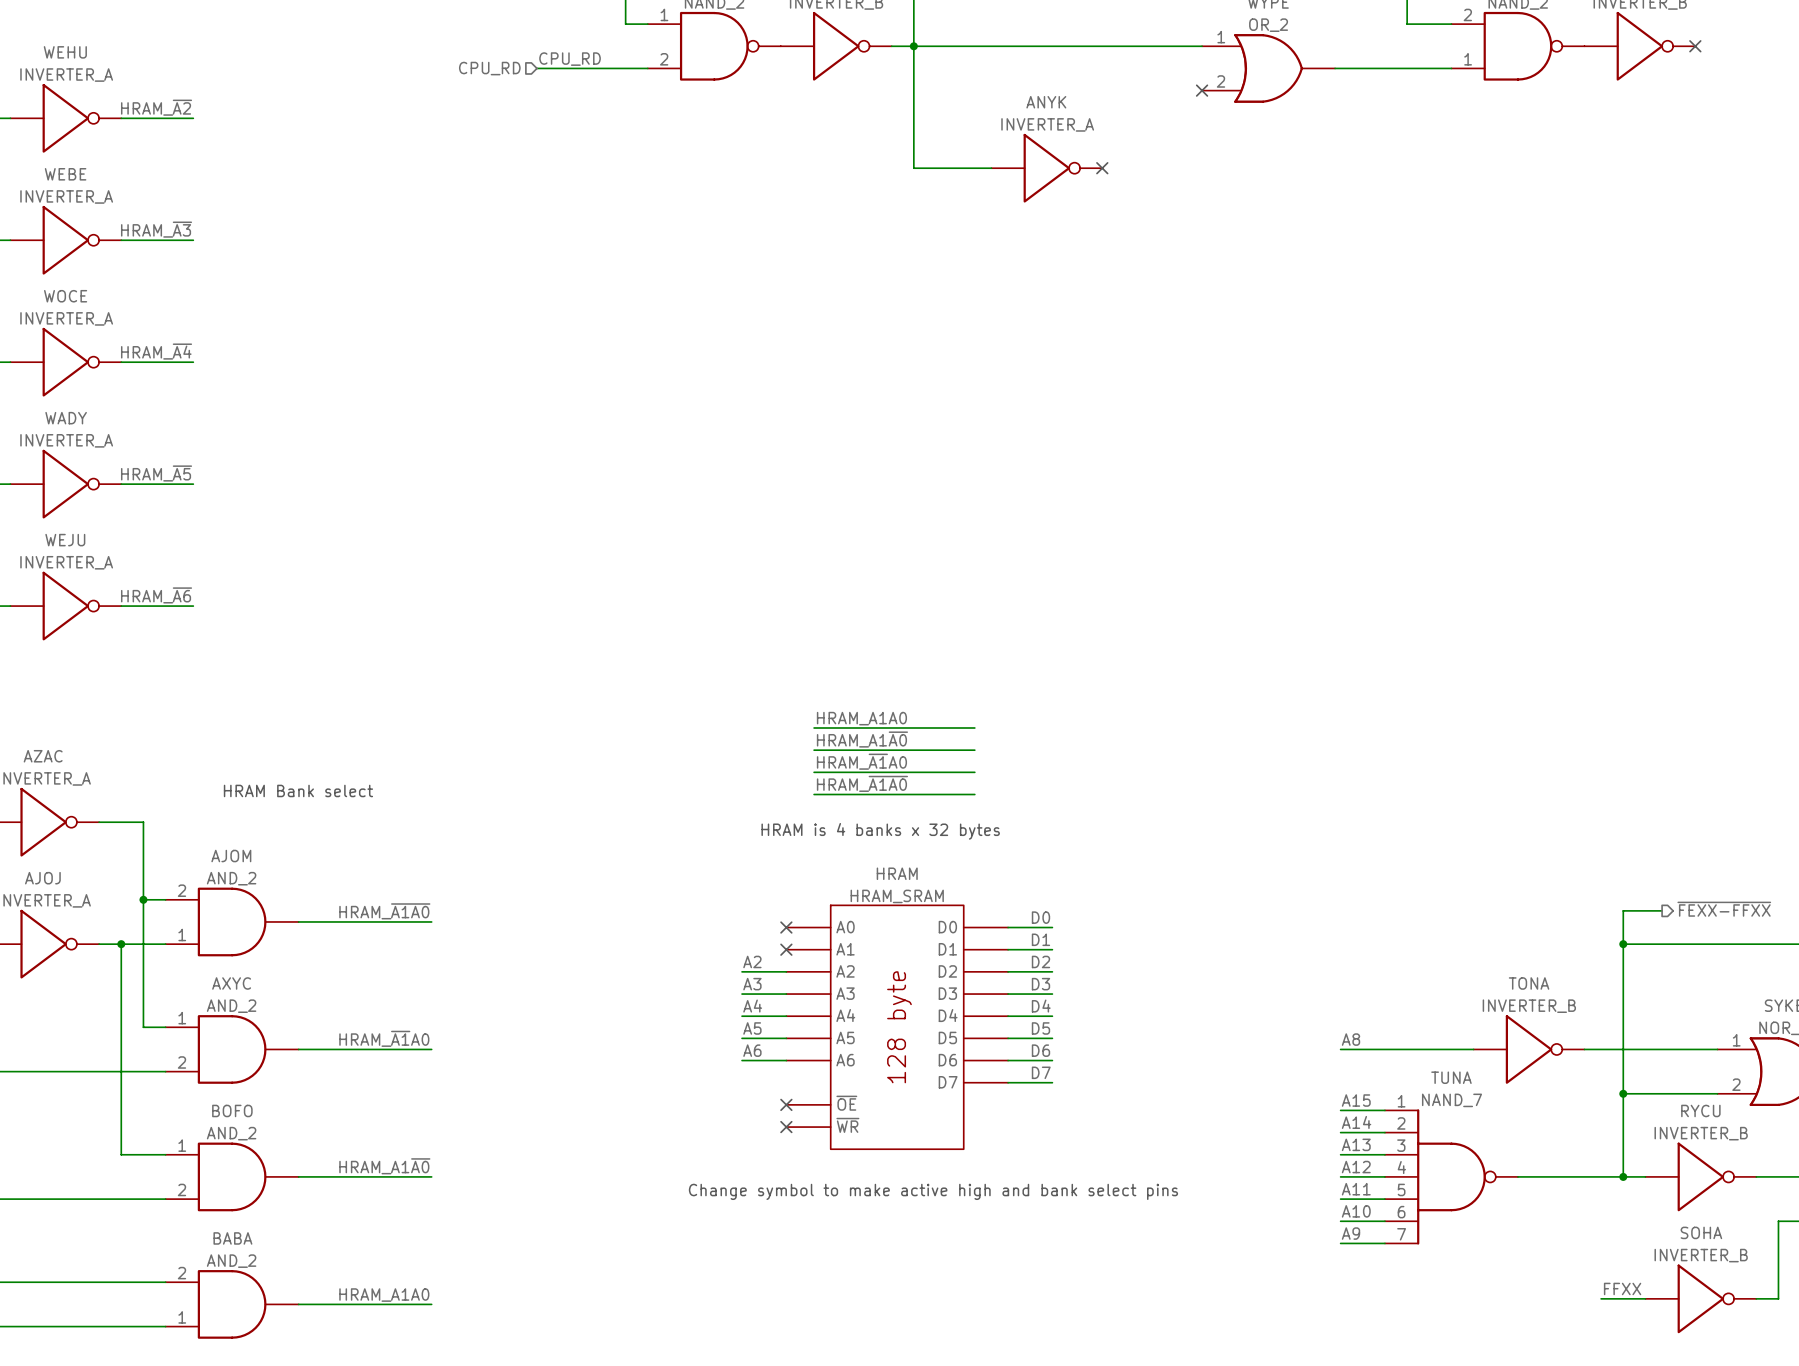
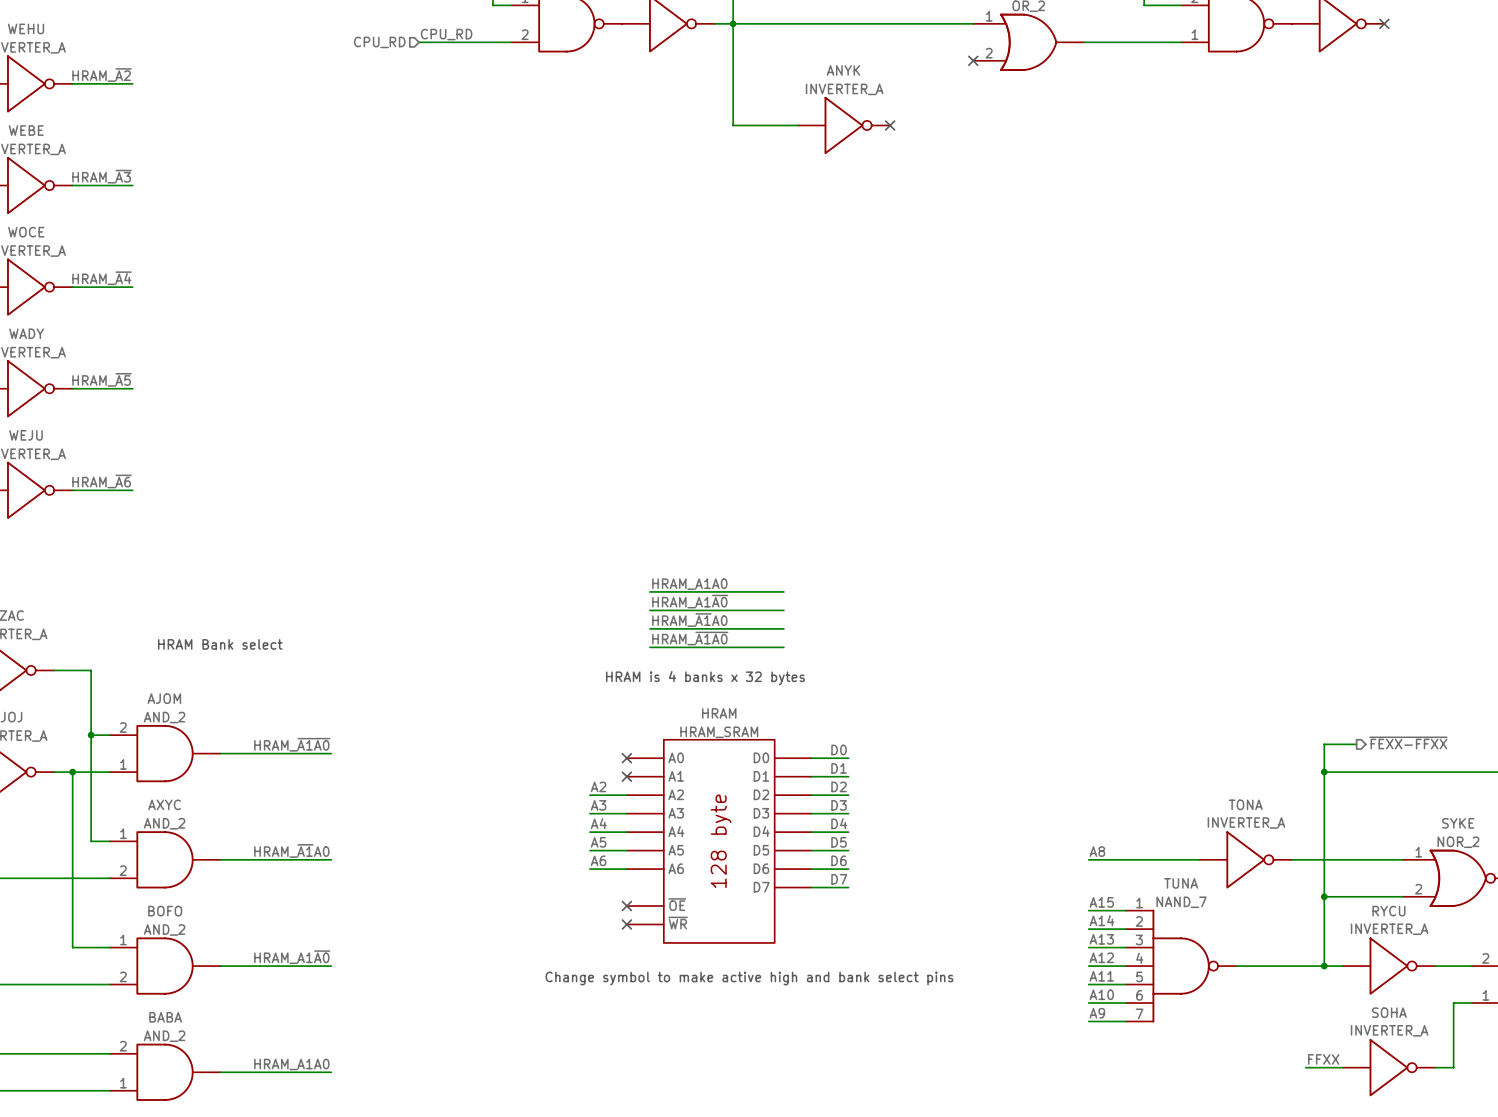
TONA value: INVERTER_B (1529, 1006) -> INVERTER_A (1246, 822)
RYCU value: INVERTER_B (1701, 1133) -> INVERTER_A (1389, 929)
SOHA value: INVERTER_B (1701, 1255) -> INVERTER_A (1389, 1030)

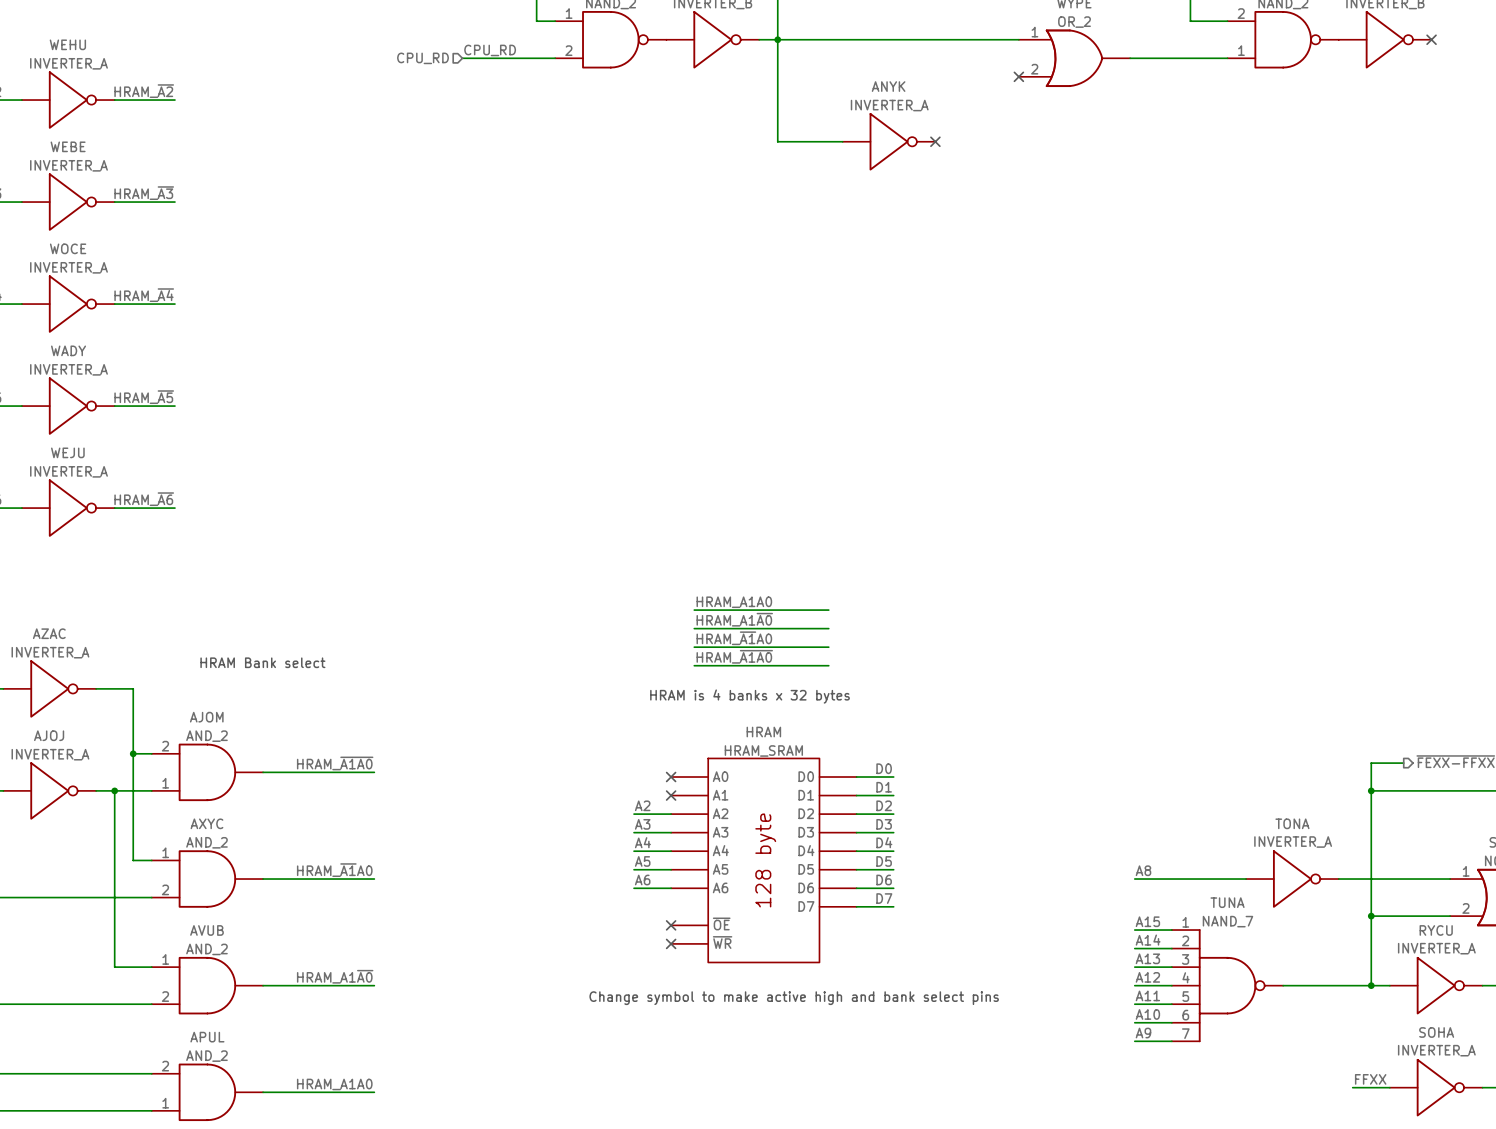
BOFO name: BOFO (165, 911) -> AVUB (206, 930)
BABA name: BABA (165, 1017) -> APUL (207, 1037)

